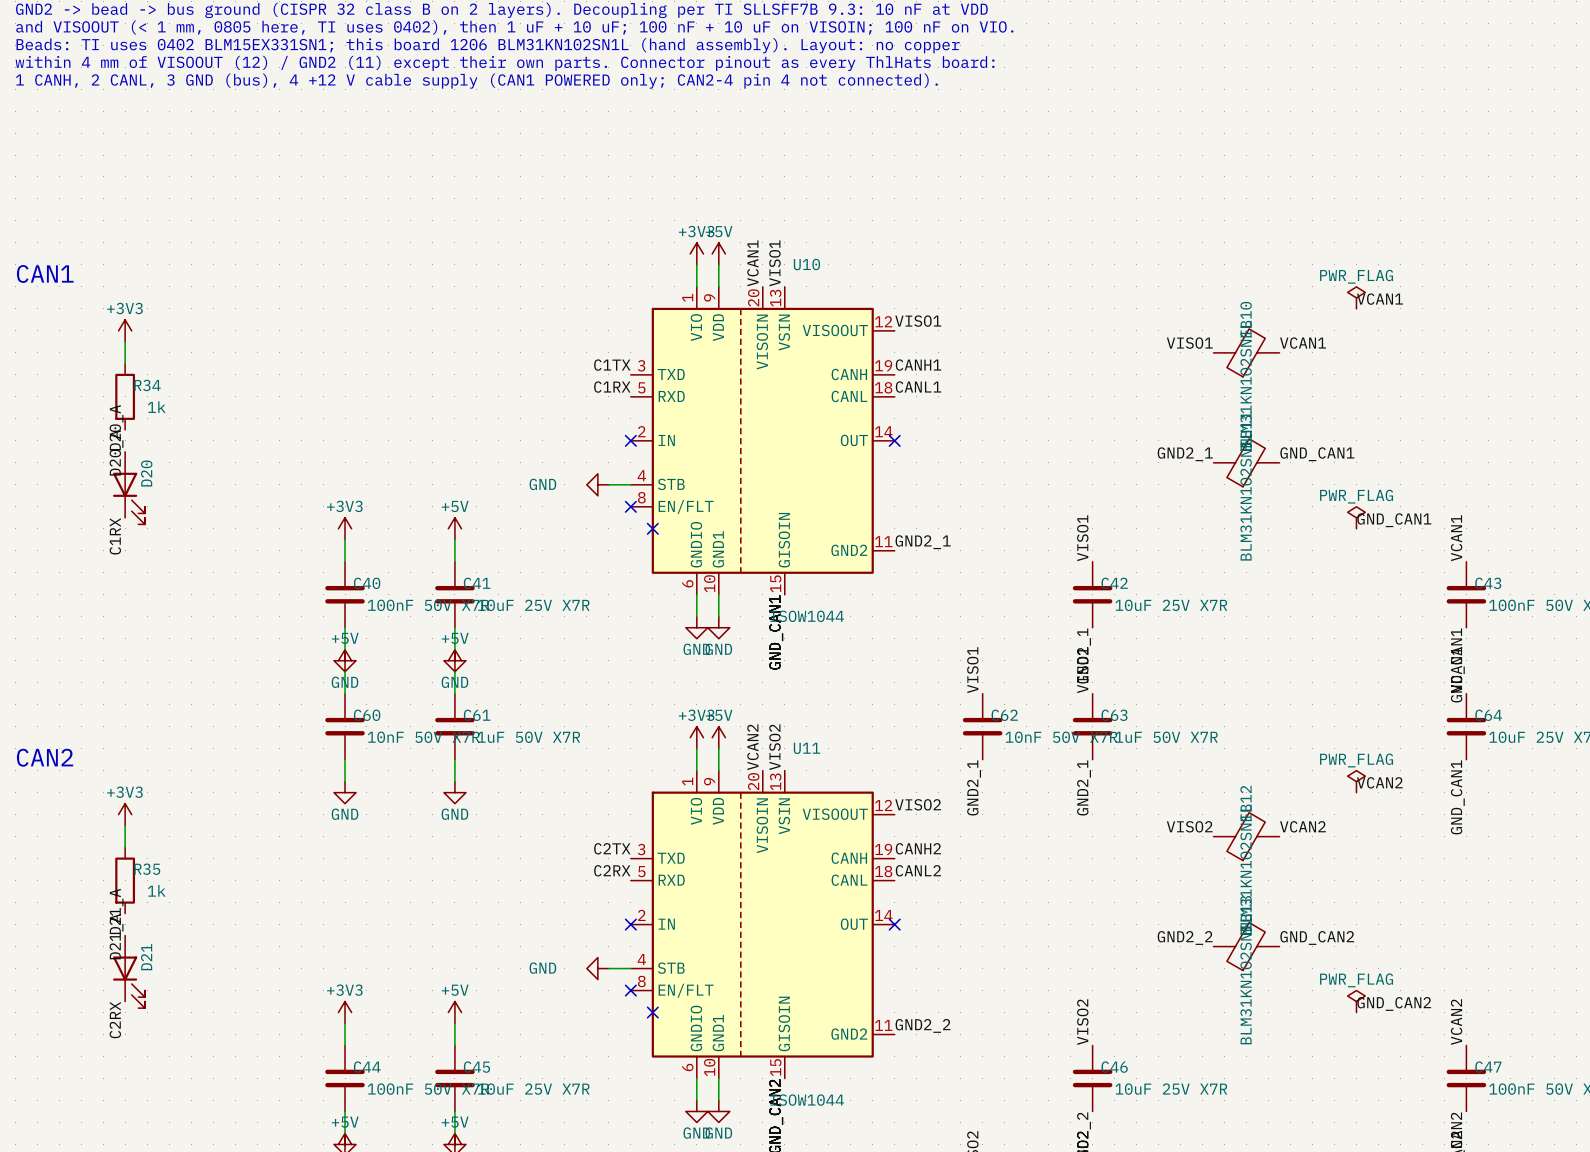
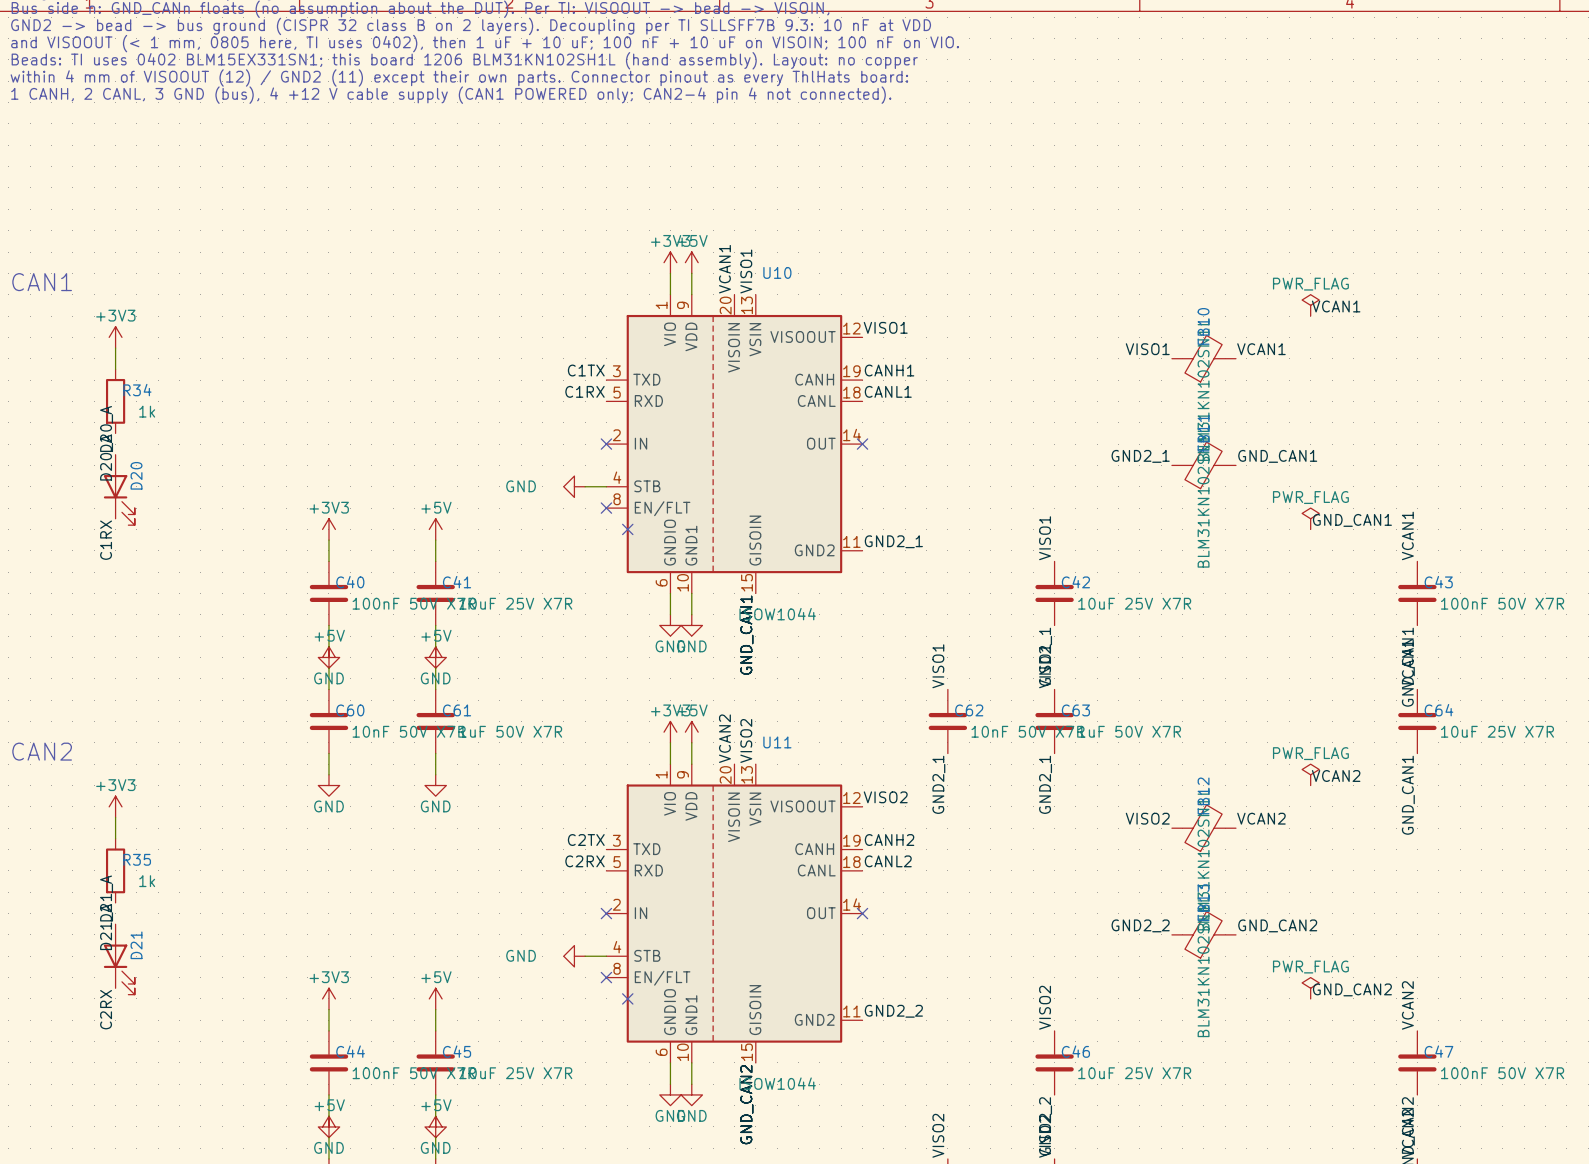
text: Beads: TI uses 0402 BLM15EX331SN1; this board 1206 BLM31KN102SN1L (hand assembly). Layout: no copper (488, 45) -> Beads: TI uses 0402 BLM15EX331SN1; this board 1206 BLM31KN102SH1L (hand assembly). Layout: no copper (464, 60)

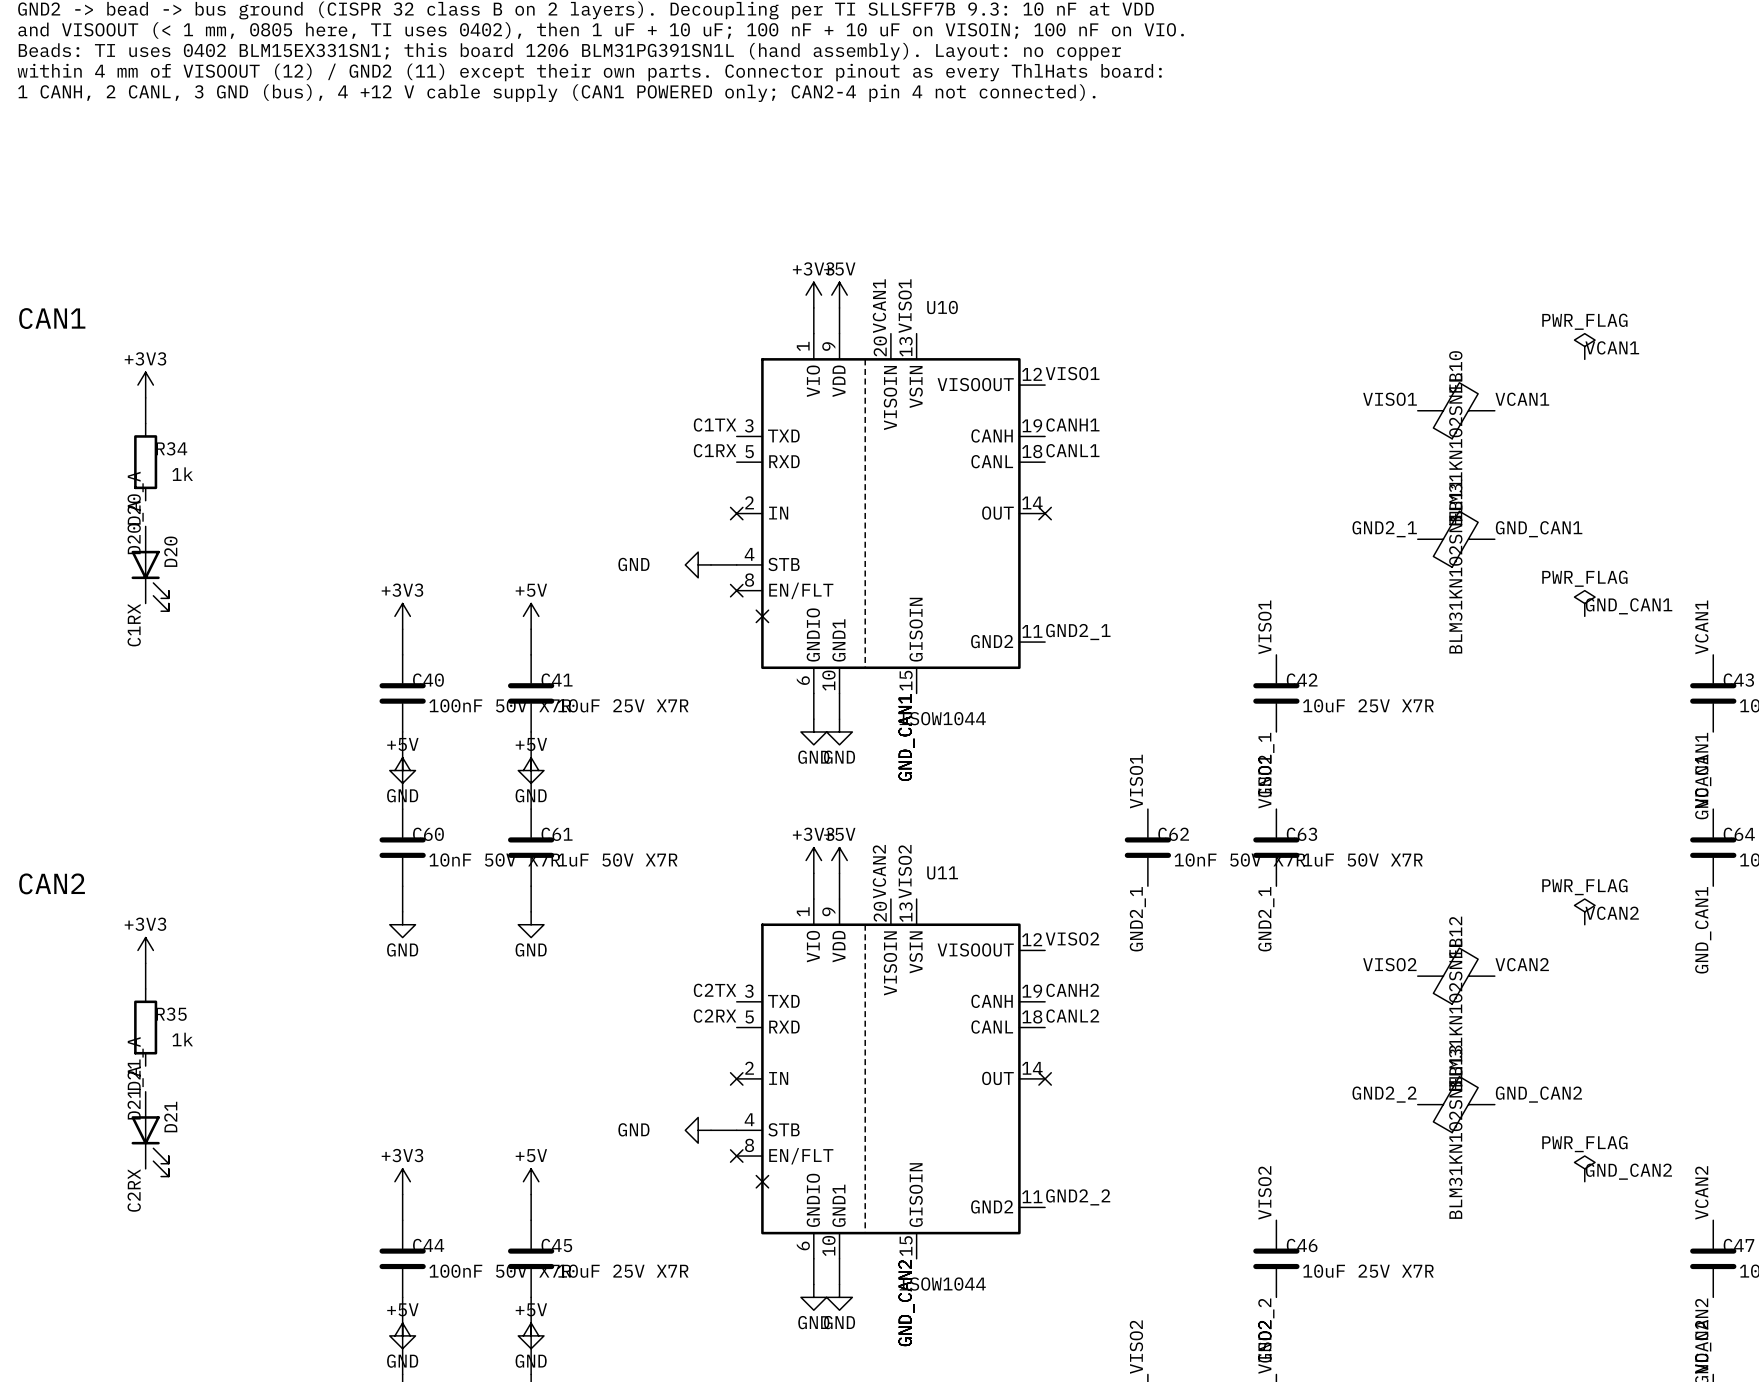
text: Beads: TI uses 0402 BLM15EX331SN1; this board 1206 BLM31KN102SH1L (hand assembly). Layout: no copper (464, 60) -> Beads: TI uses 0402 BLM15EX331SN1; this board 1206 BLM31PG391SN1L (hand assembly). Layout: no copper (569, 51)

